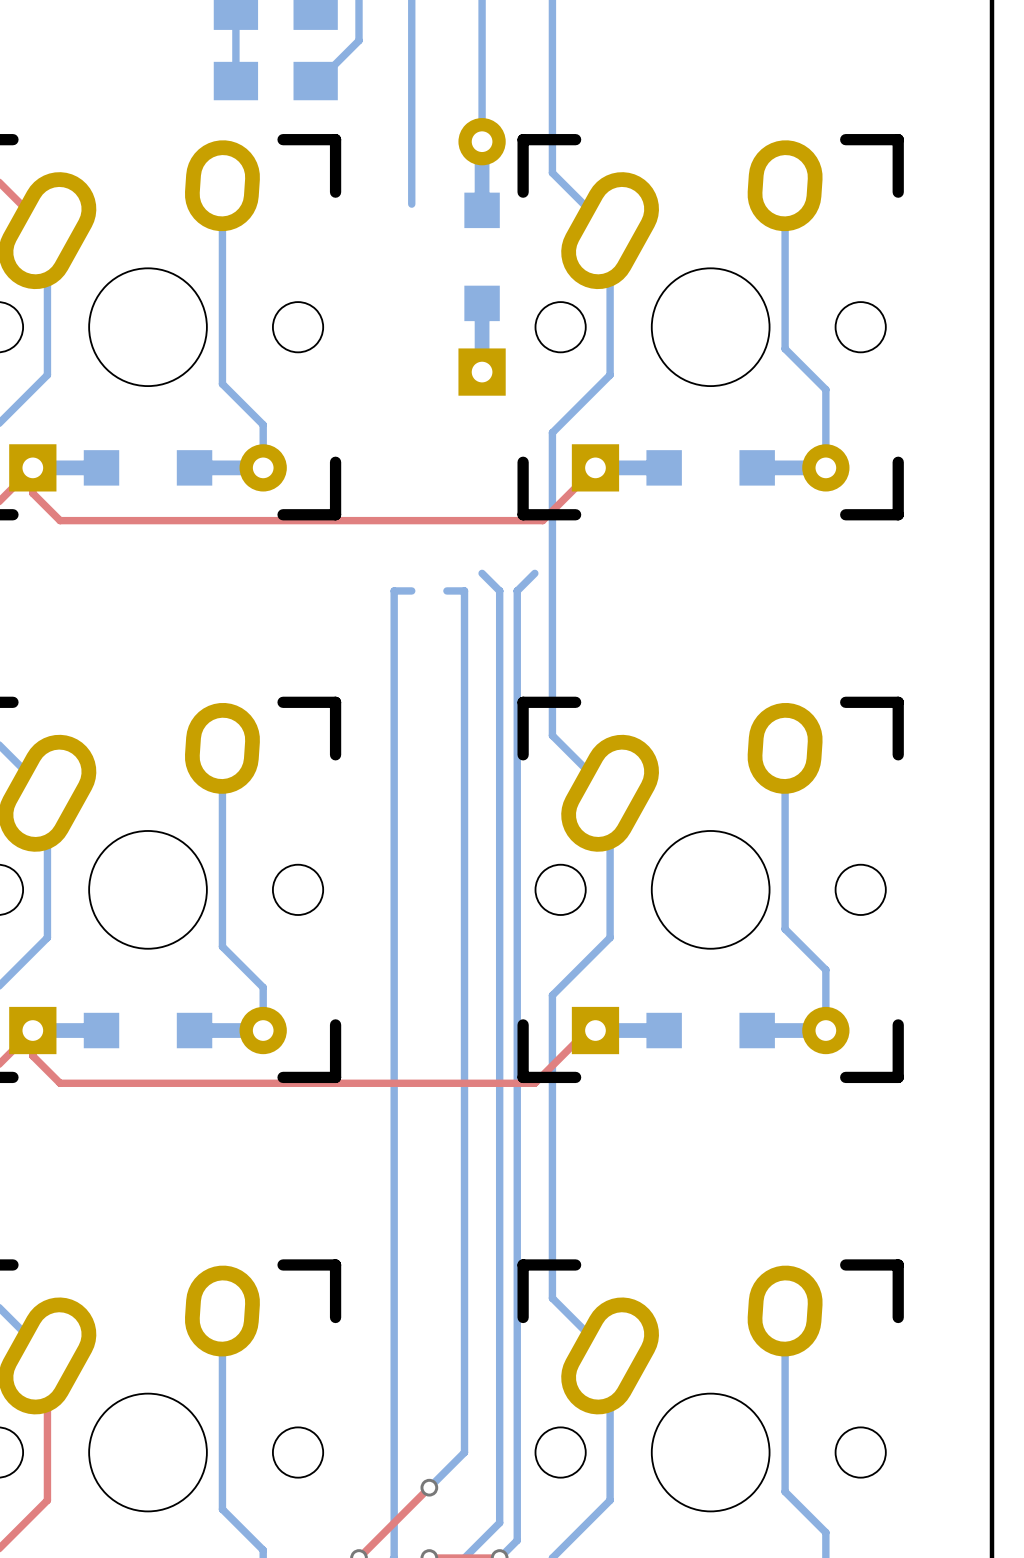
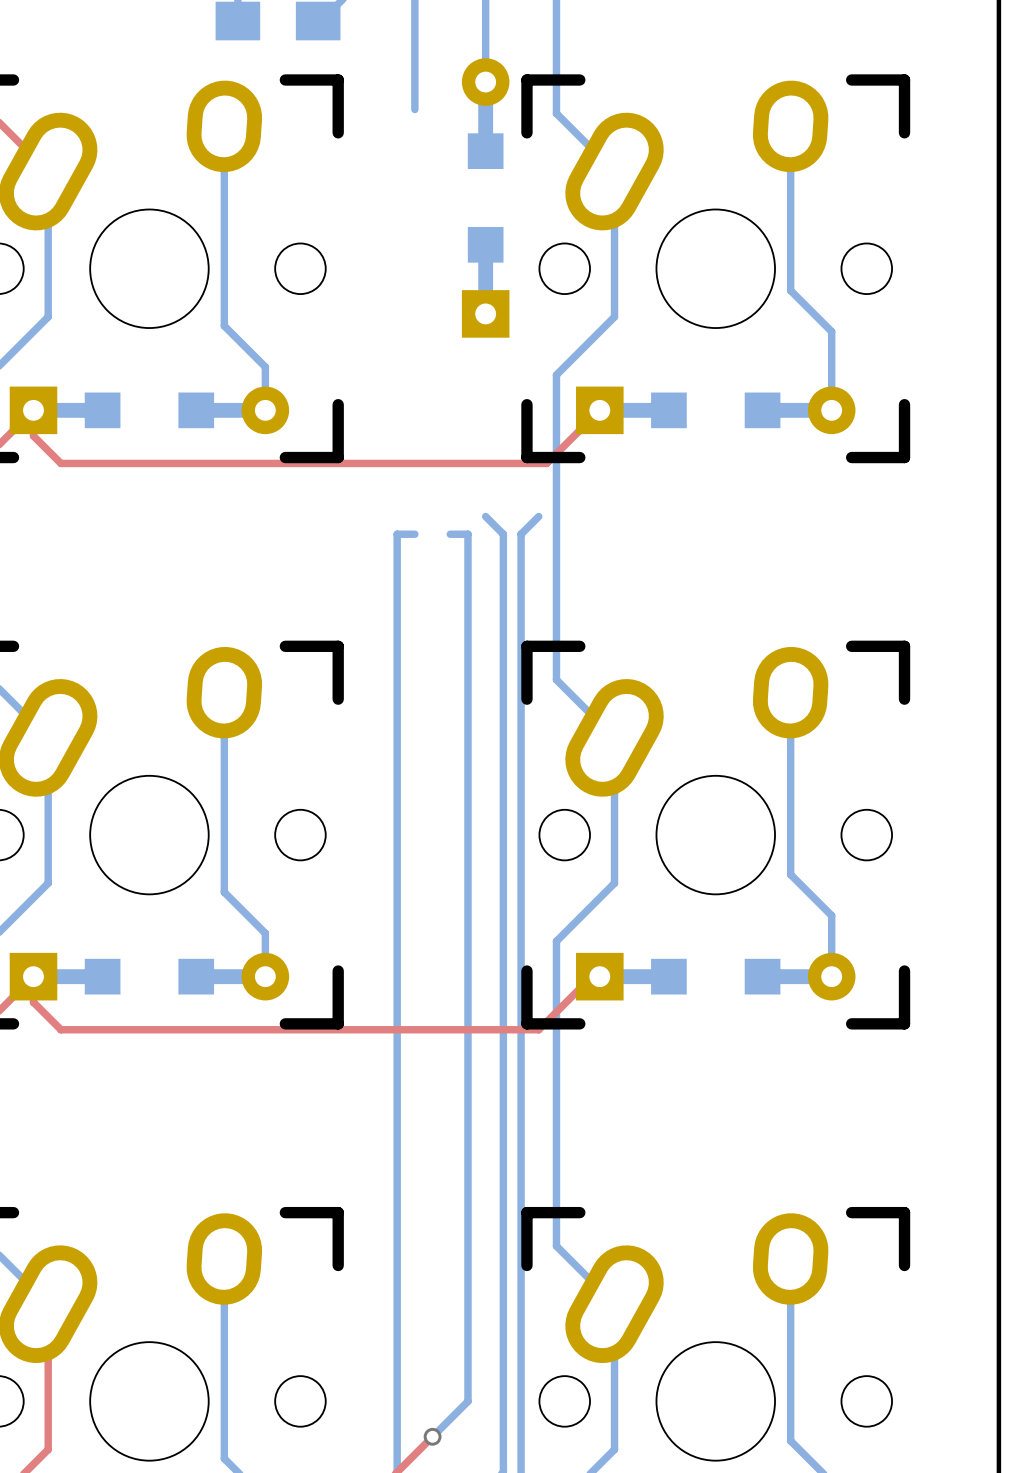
bottom track: (411, 168) (411, 204) -> none

